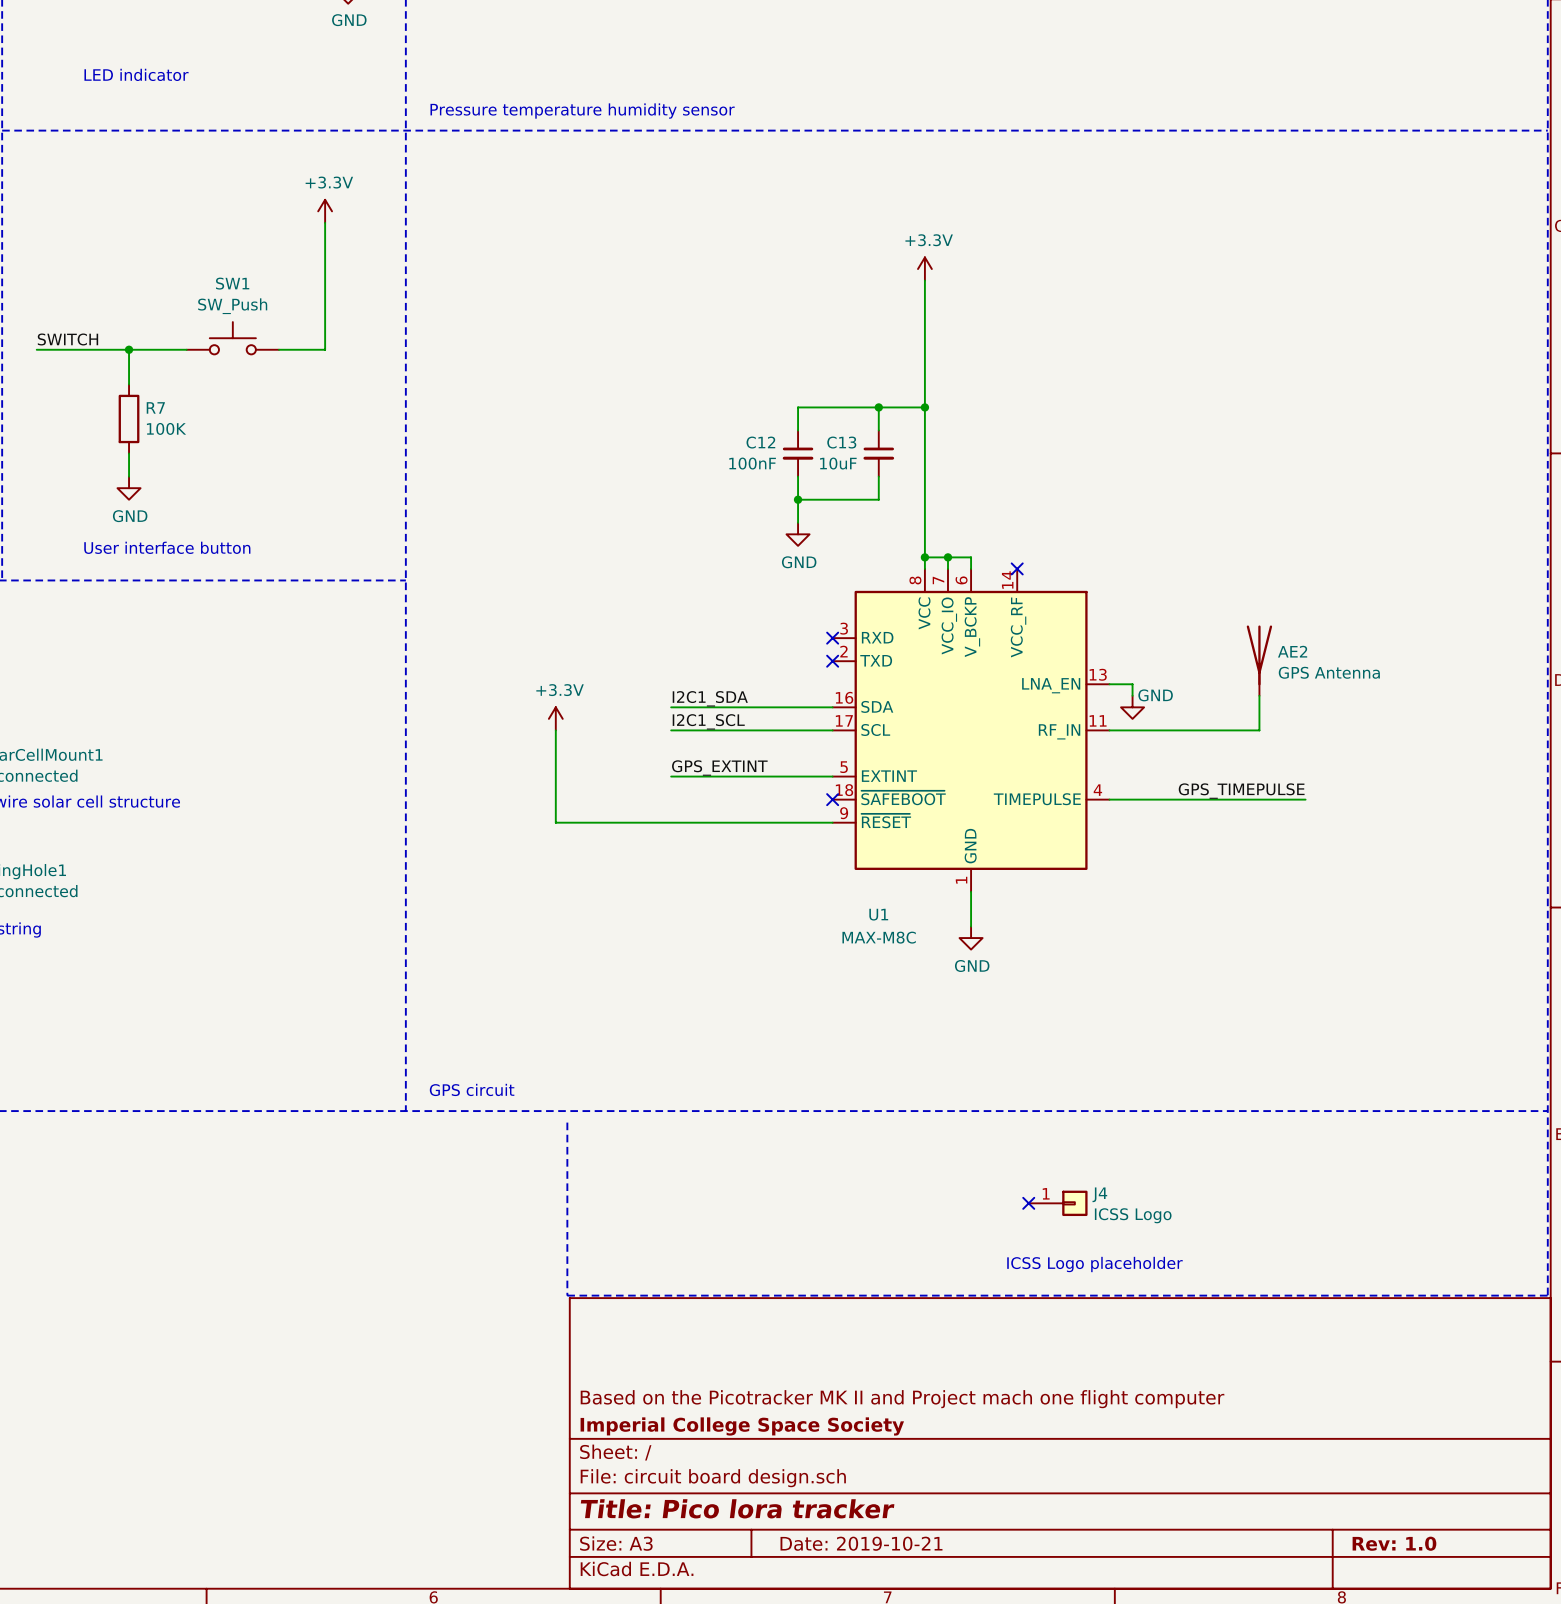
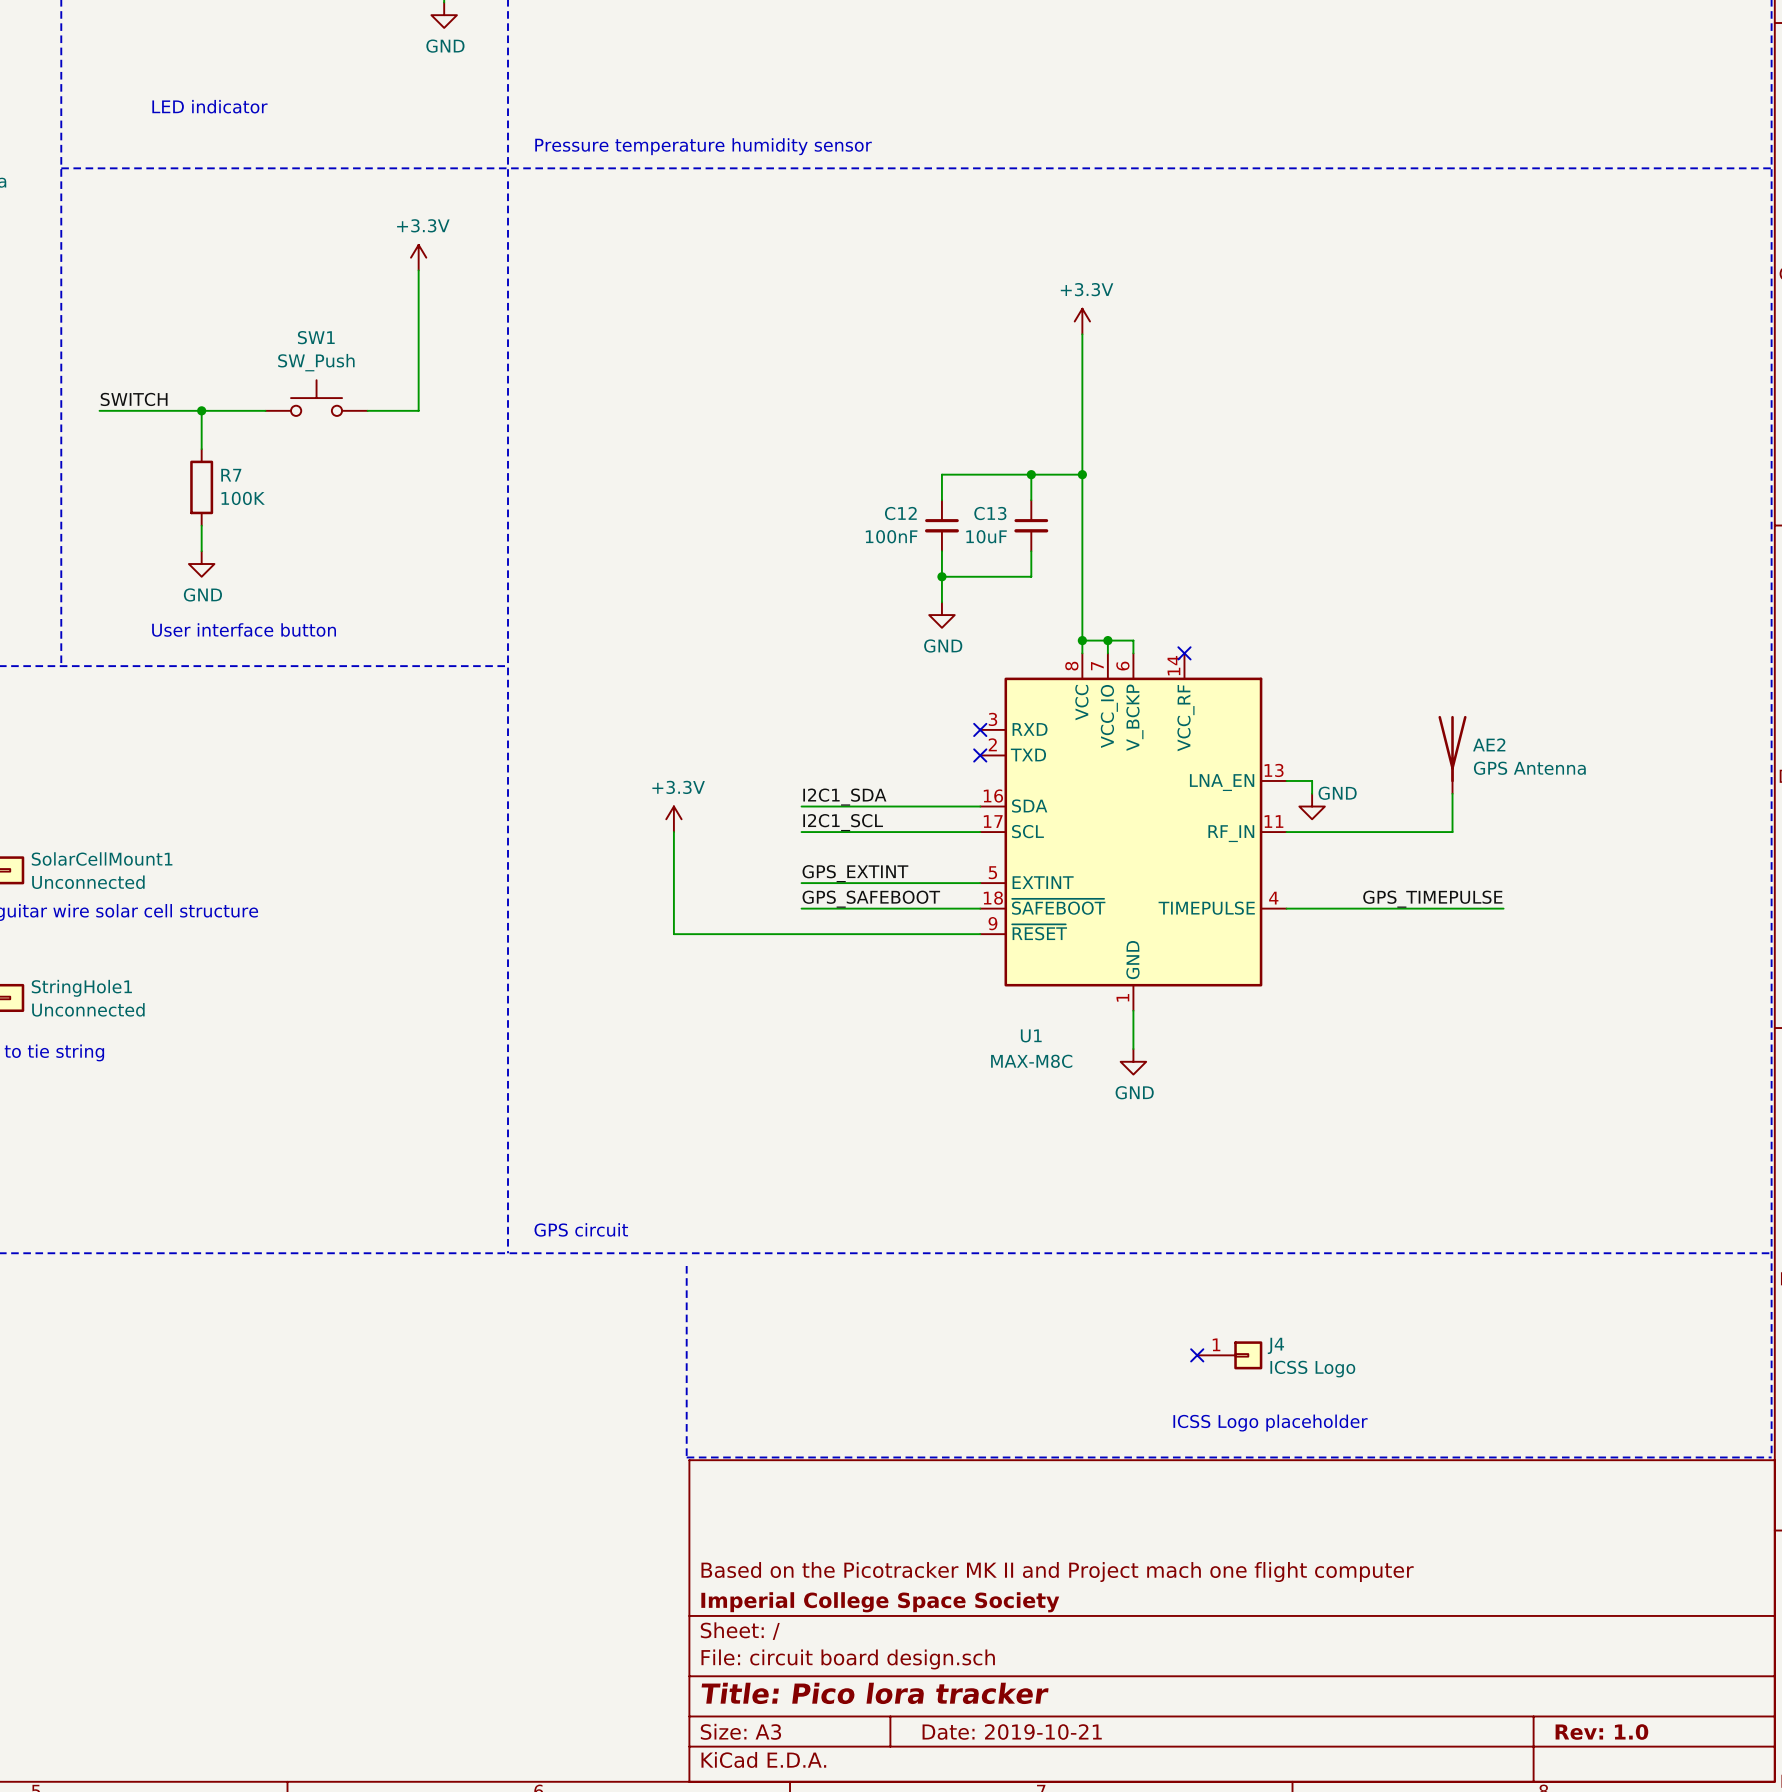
label: none -> GPS_SAFEBOOT (871, 899)
wire: none -> (801, 908) (980, 908)
no-connect mark: (832, 799) -> none

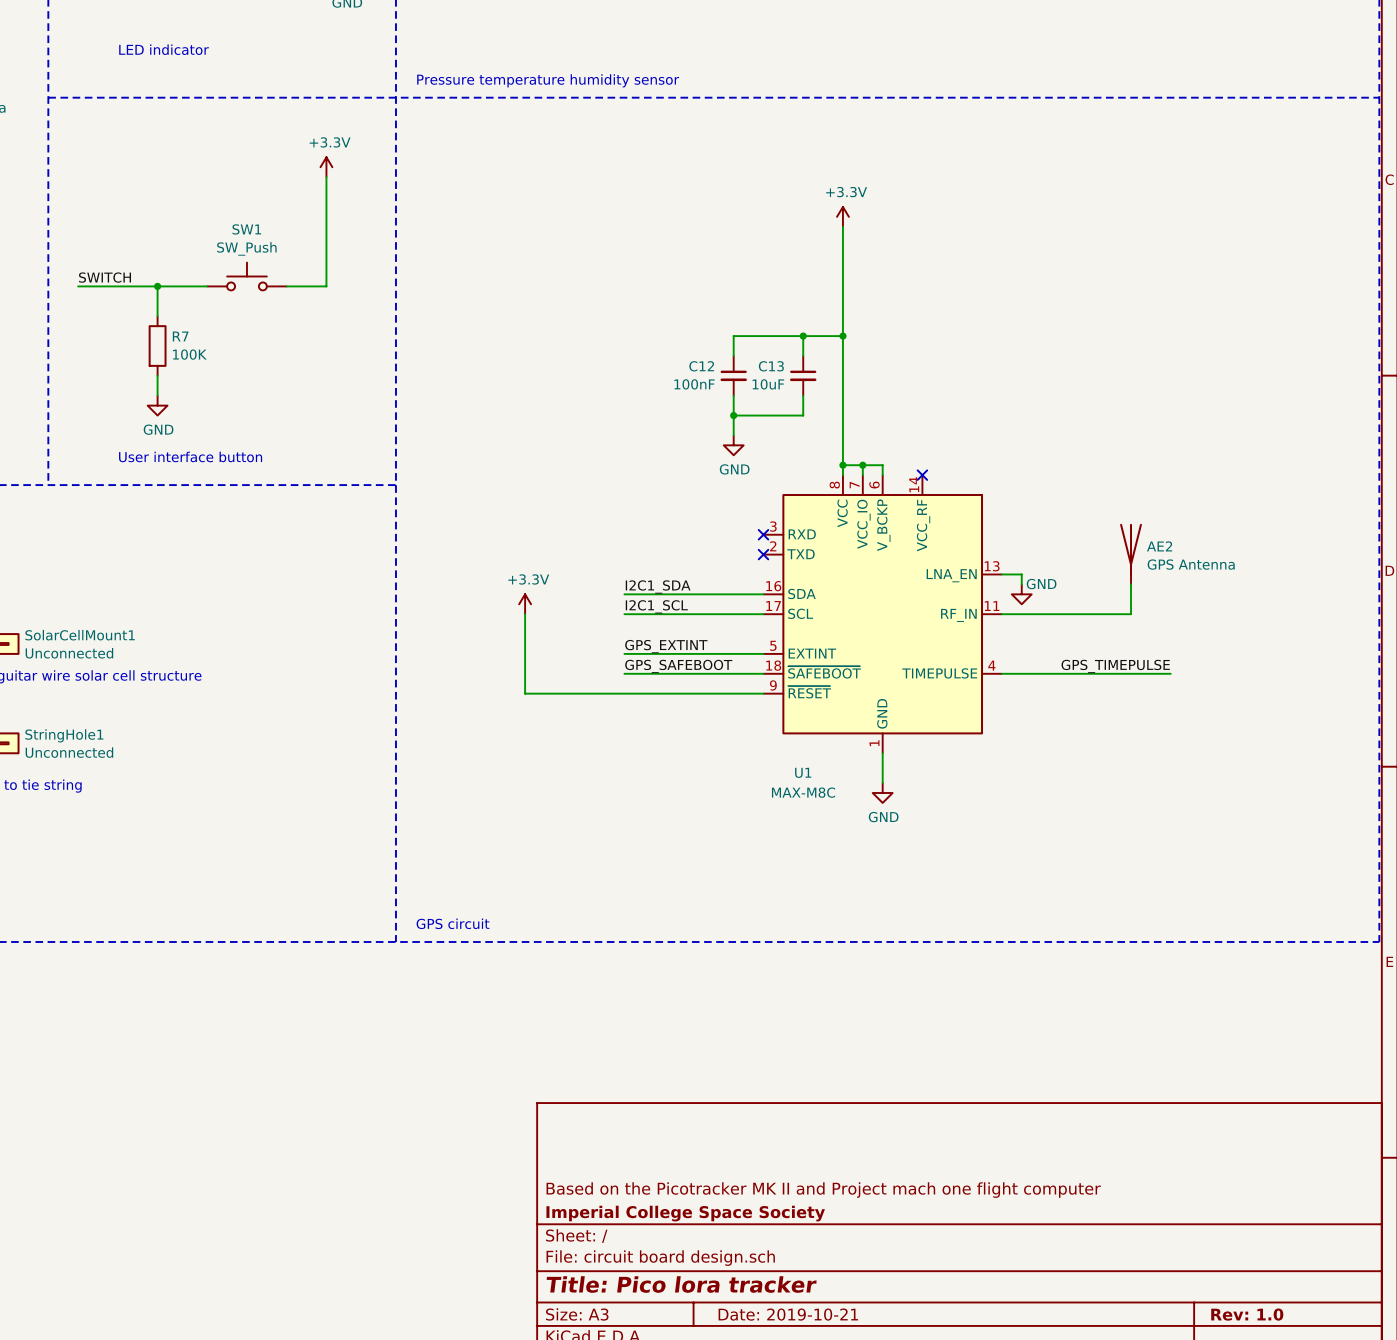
line: (1771, 1253) (1771, 1457) (686, 1457) (686, 1266) -> none
no-connect mark: (1197, 1355) -> none
J4: ICSS Logo (1229, 1355) -> none
text: ICSS Logo placeholder (1270, 1423) -> none

